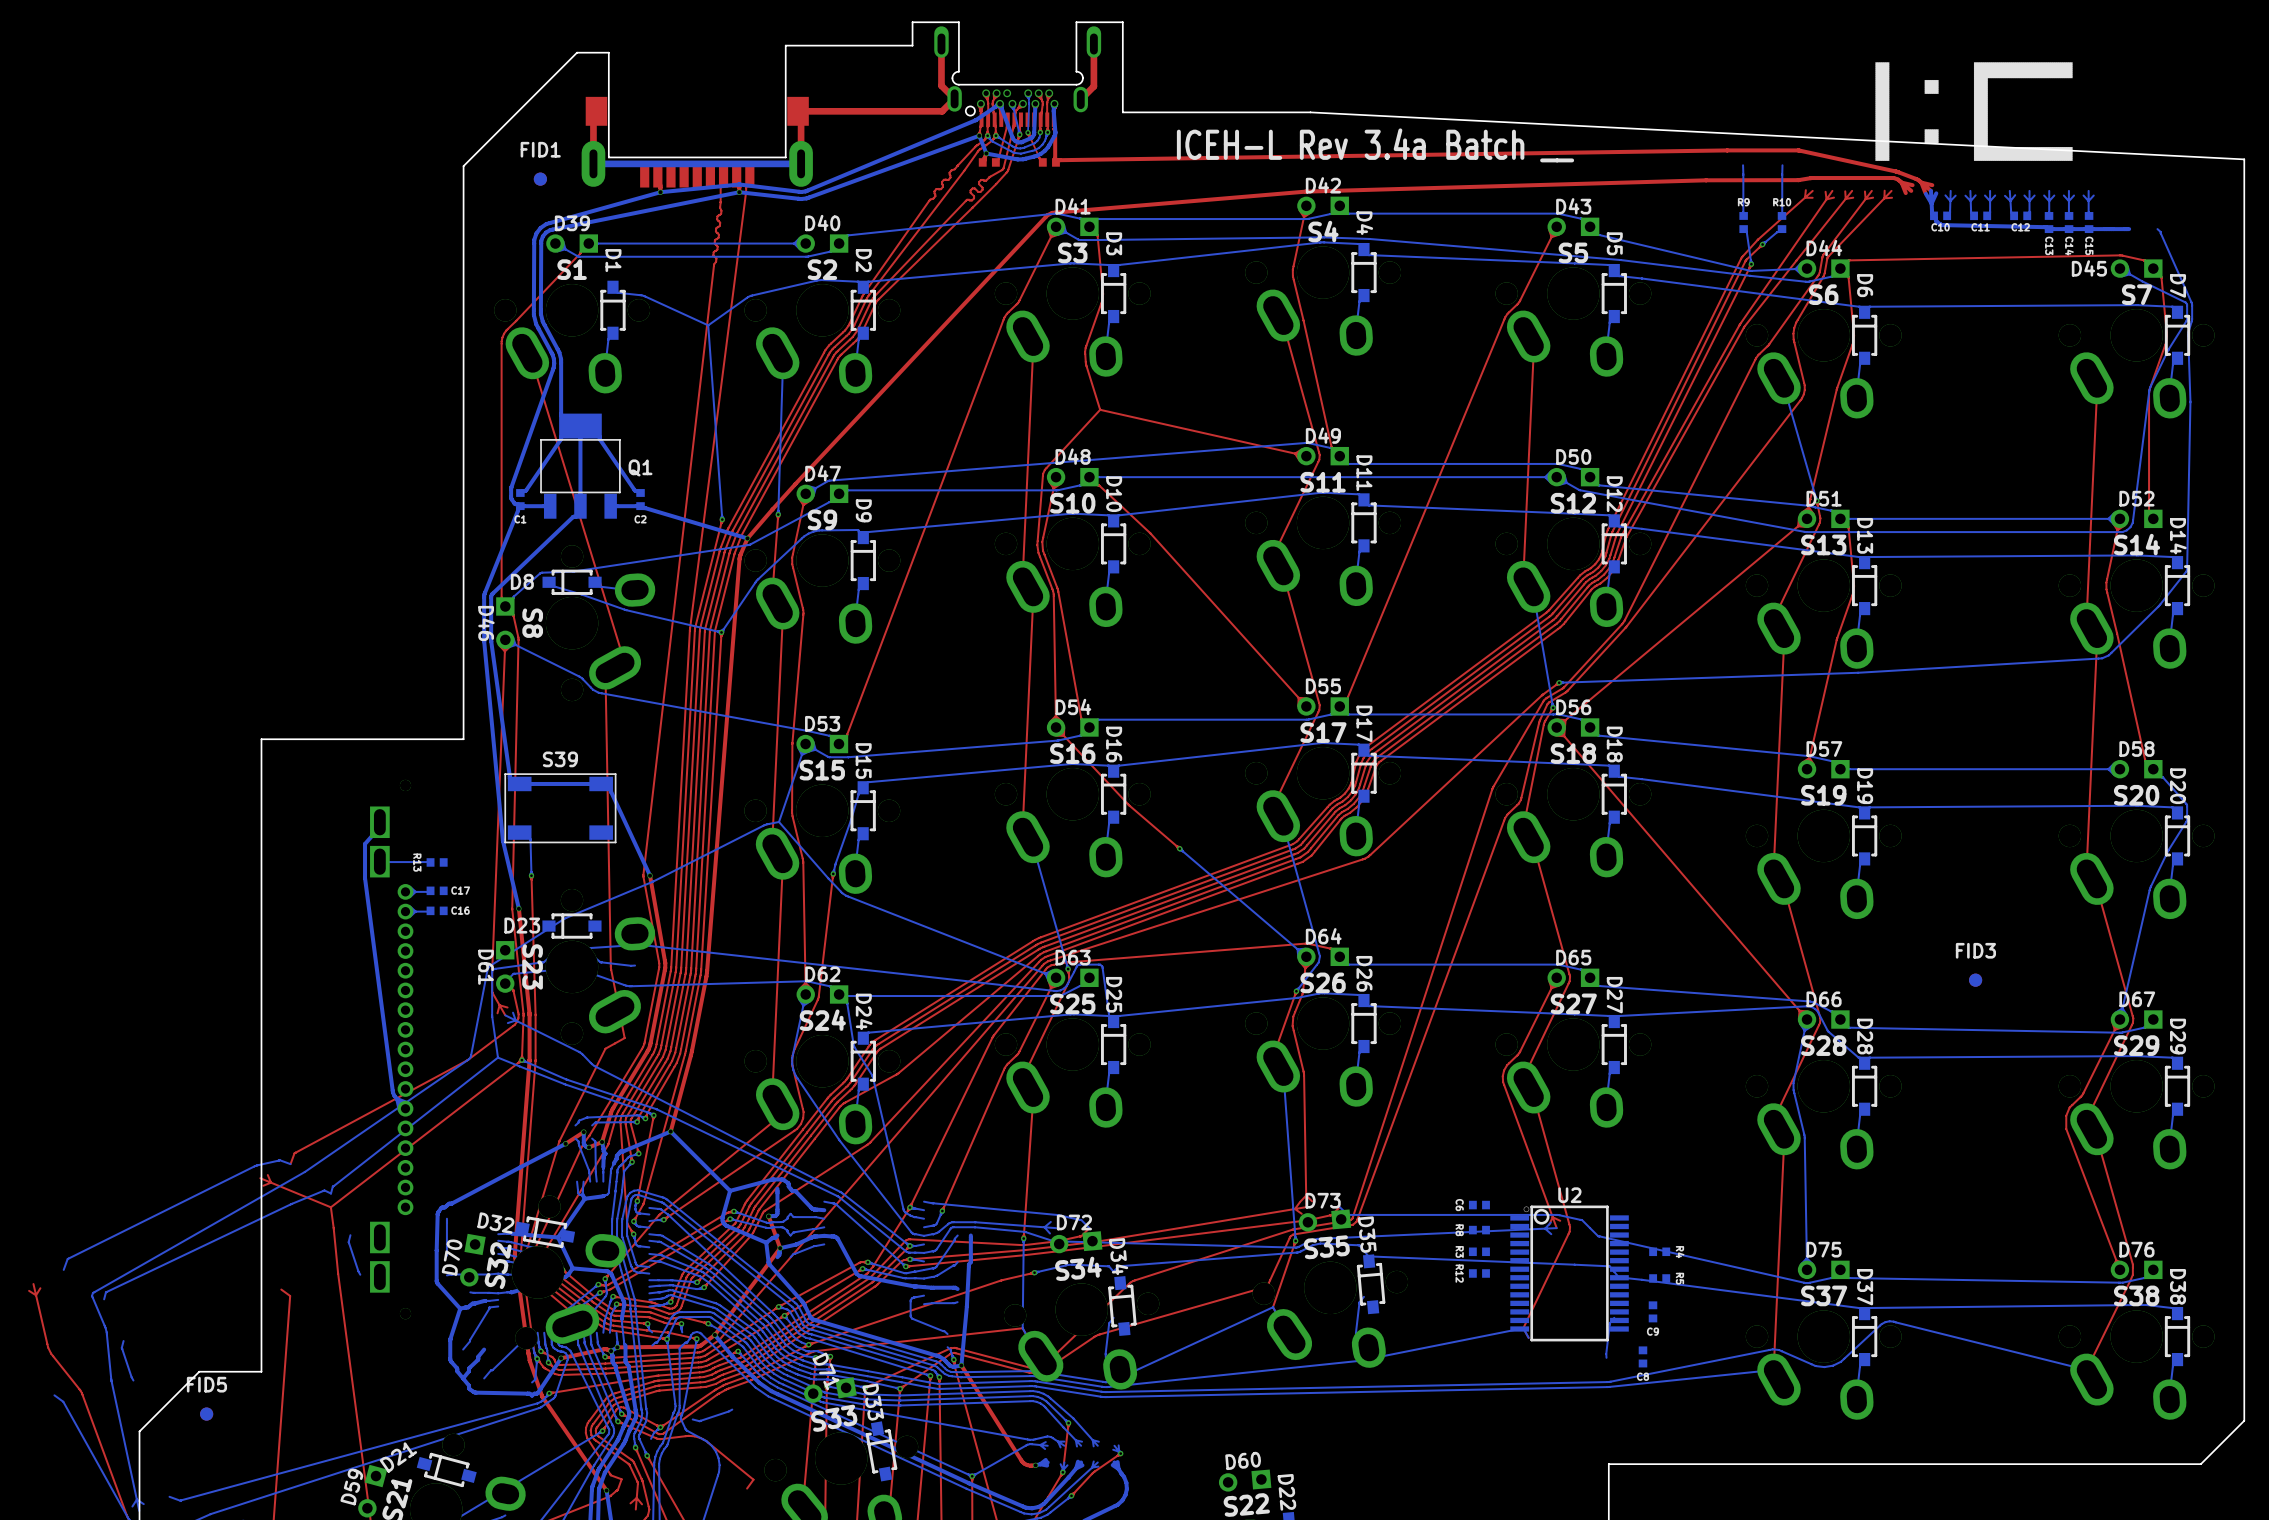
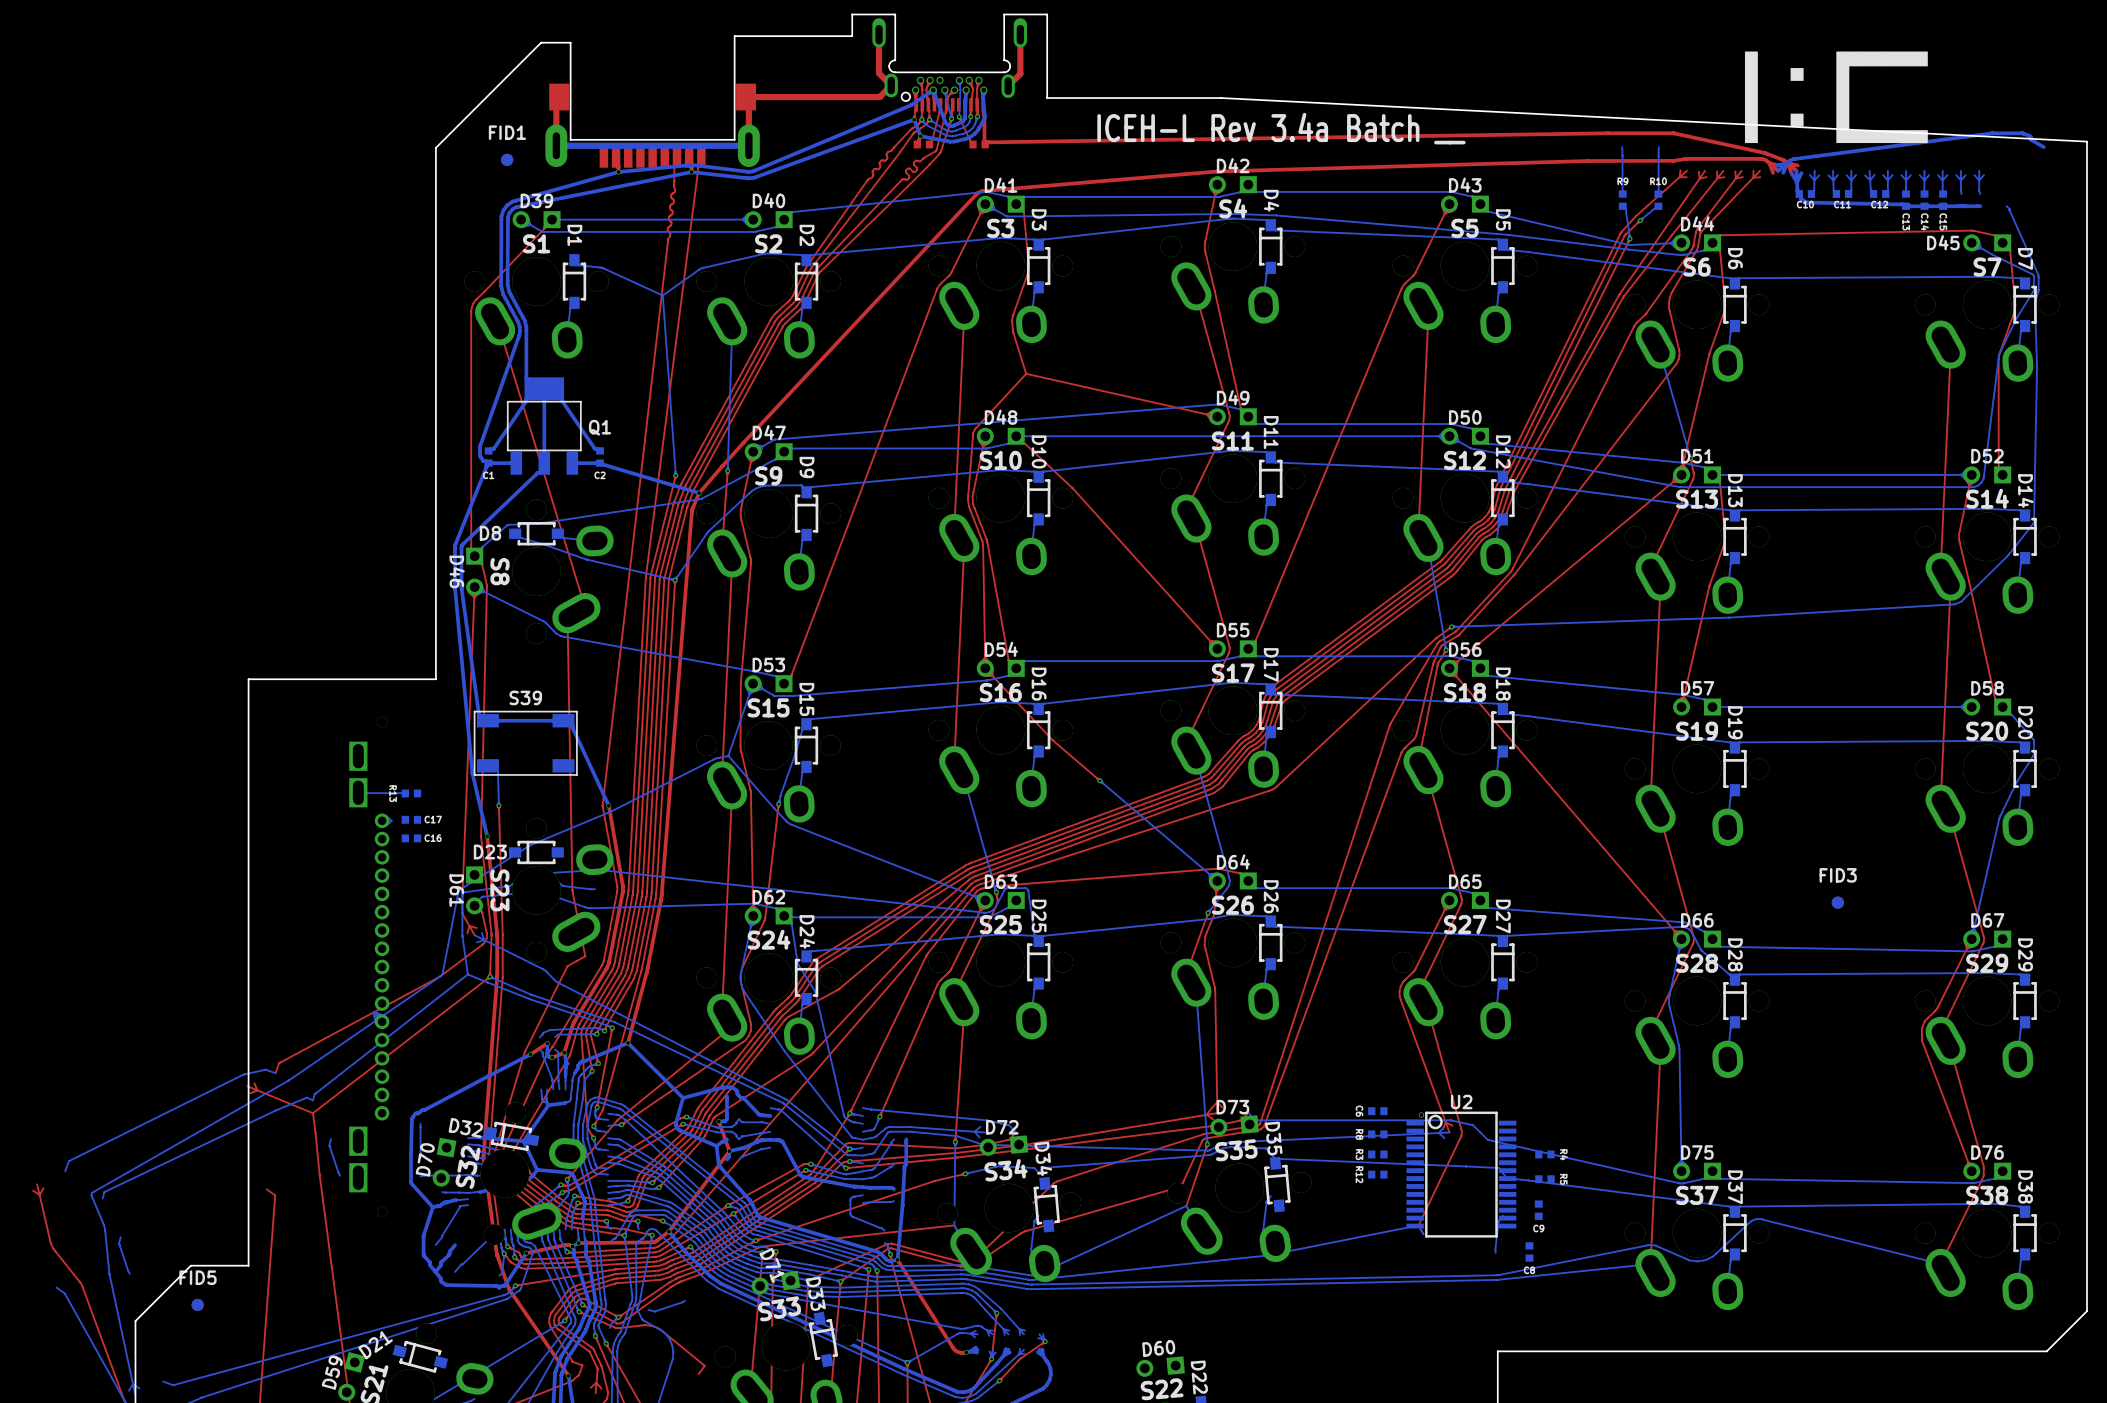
bottom track: none -> (1992, 133) (1793, 159) (1778, 170)
bottom track: none -> (1992, 133) (2023, 133) (2043, 147)
bottom track: none -> (1776, 165) (1787, 163) (1783, 172)
bottom track: none -> (1960, 170) (1961, 194)
bottom track: none -> (1979, 170) (1980, 194)
bottom track: none -> (1965, 175) (1960, 180) (1956, 175)
bottom track: none -> (1983, 175) (1979, 180) (1974, 175)
bottom track: (379, 822) (365, 843) (365, 878) (392, 1092) (405, 1108) -> none
bottom track: (430, 890) (405, 891) -> none
bottom track: (410, 906) (415, 911) (410, 916) -> none
bottom track: (430, 910) (405, 911) -> none

